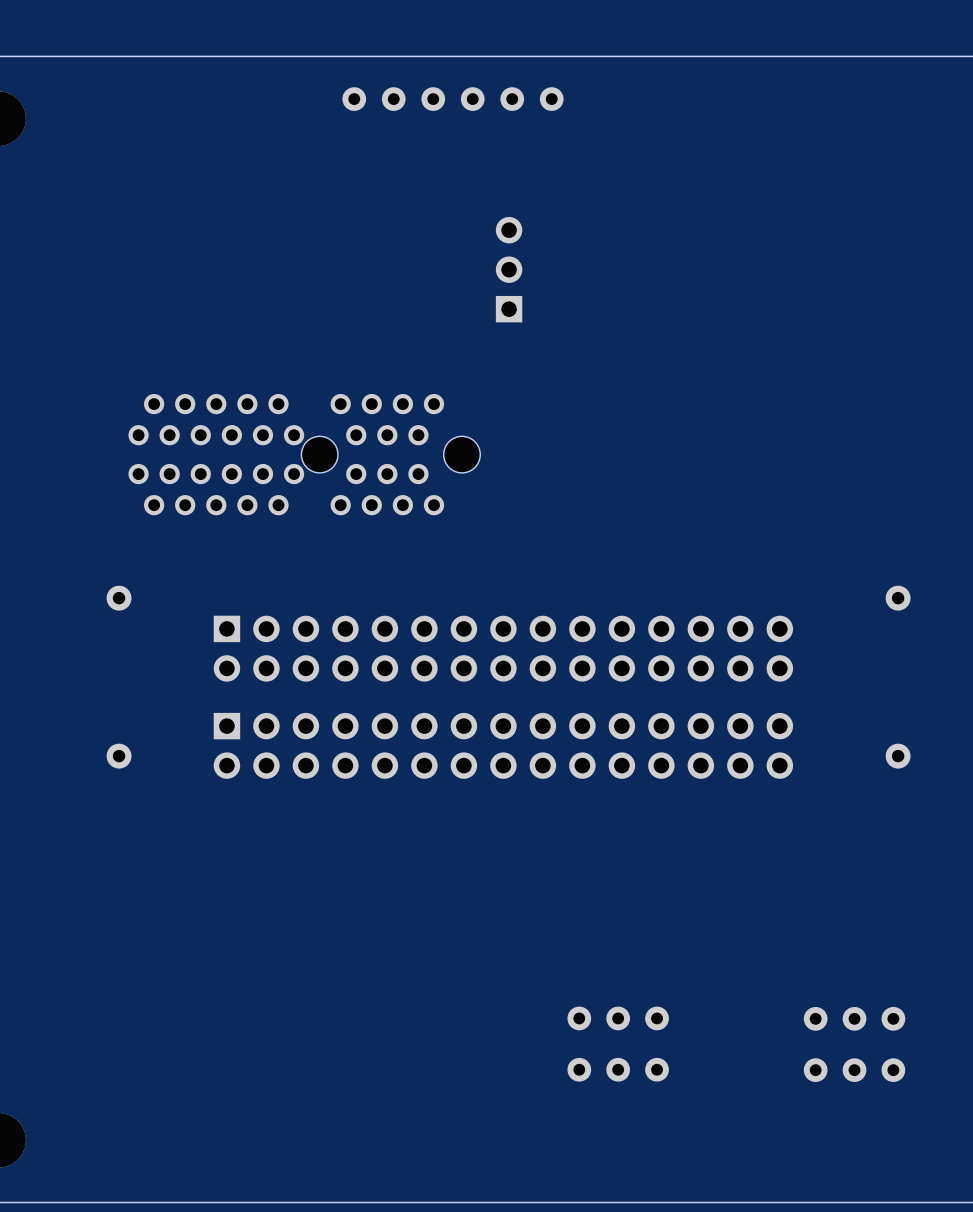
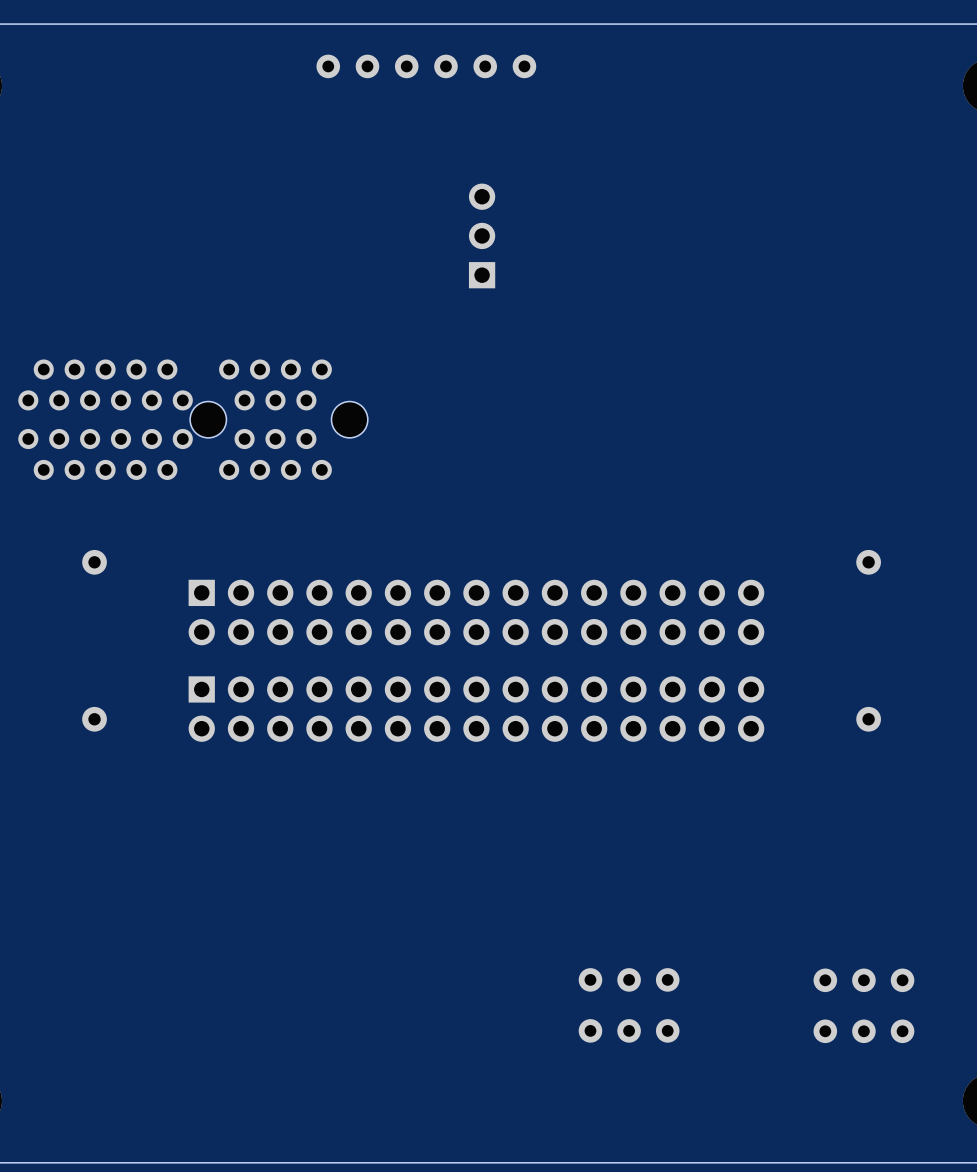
part position: (304, 454) -> (193, 419)
part position: (618, 1044) -> (629, 1005)
part position: (854, 1044) -> (863, 1005)

